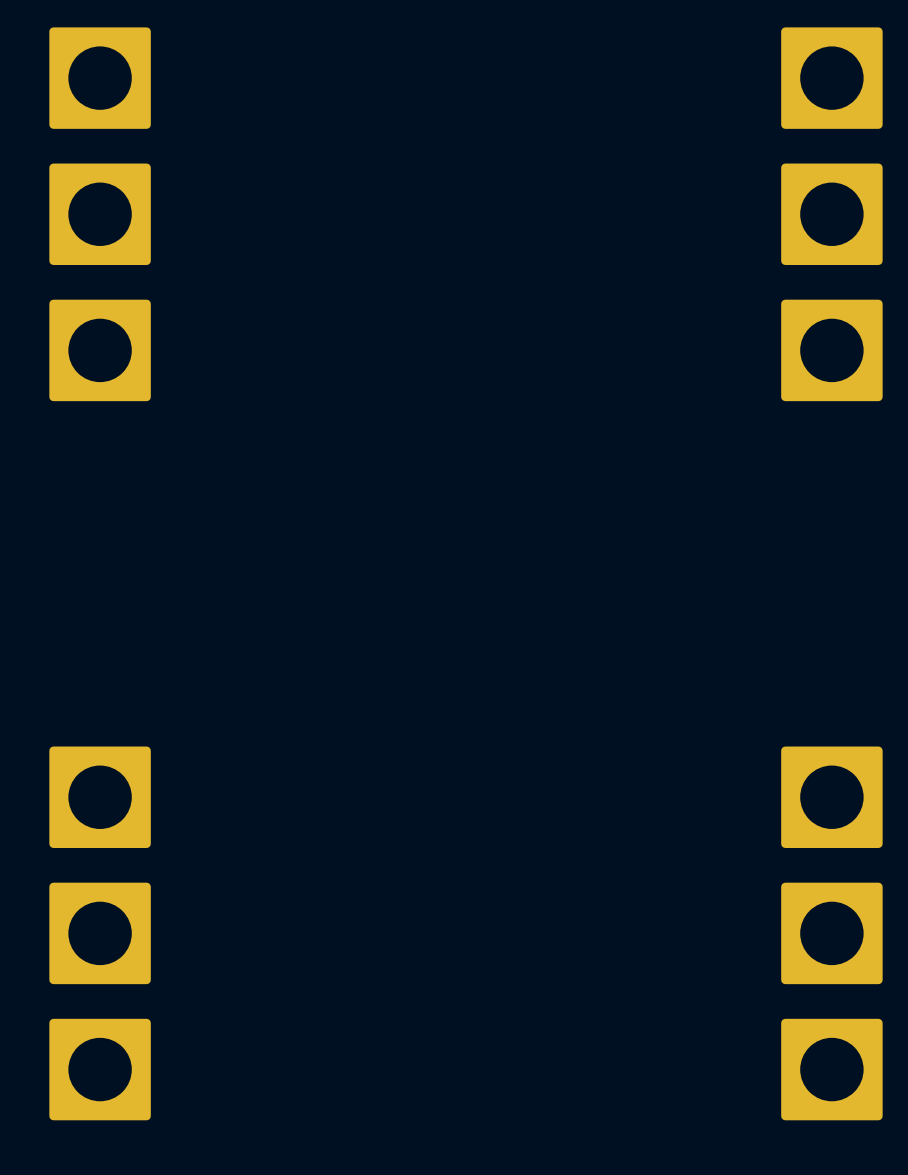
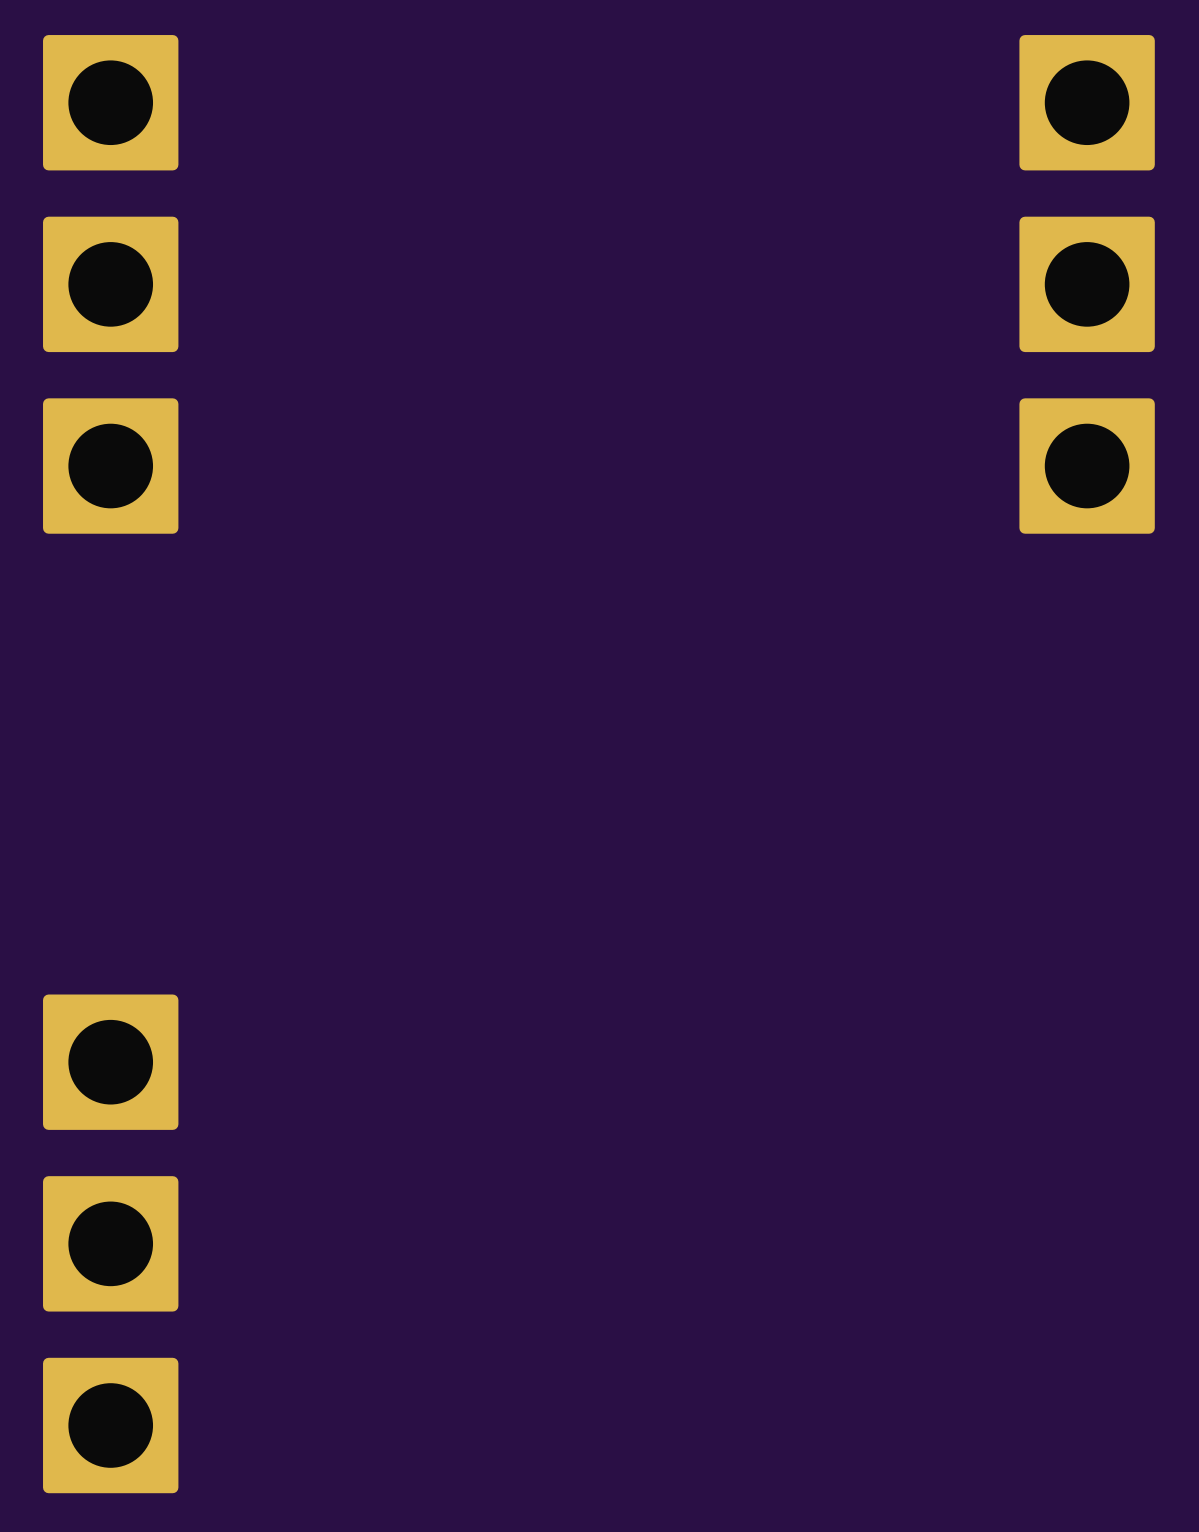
part: (831, 797) -> none
part: (831, 933) -> none
part: (831, 1069) -> none

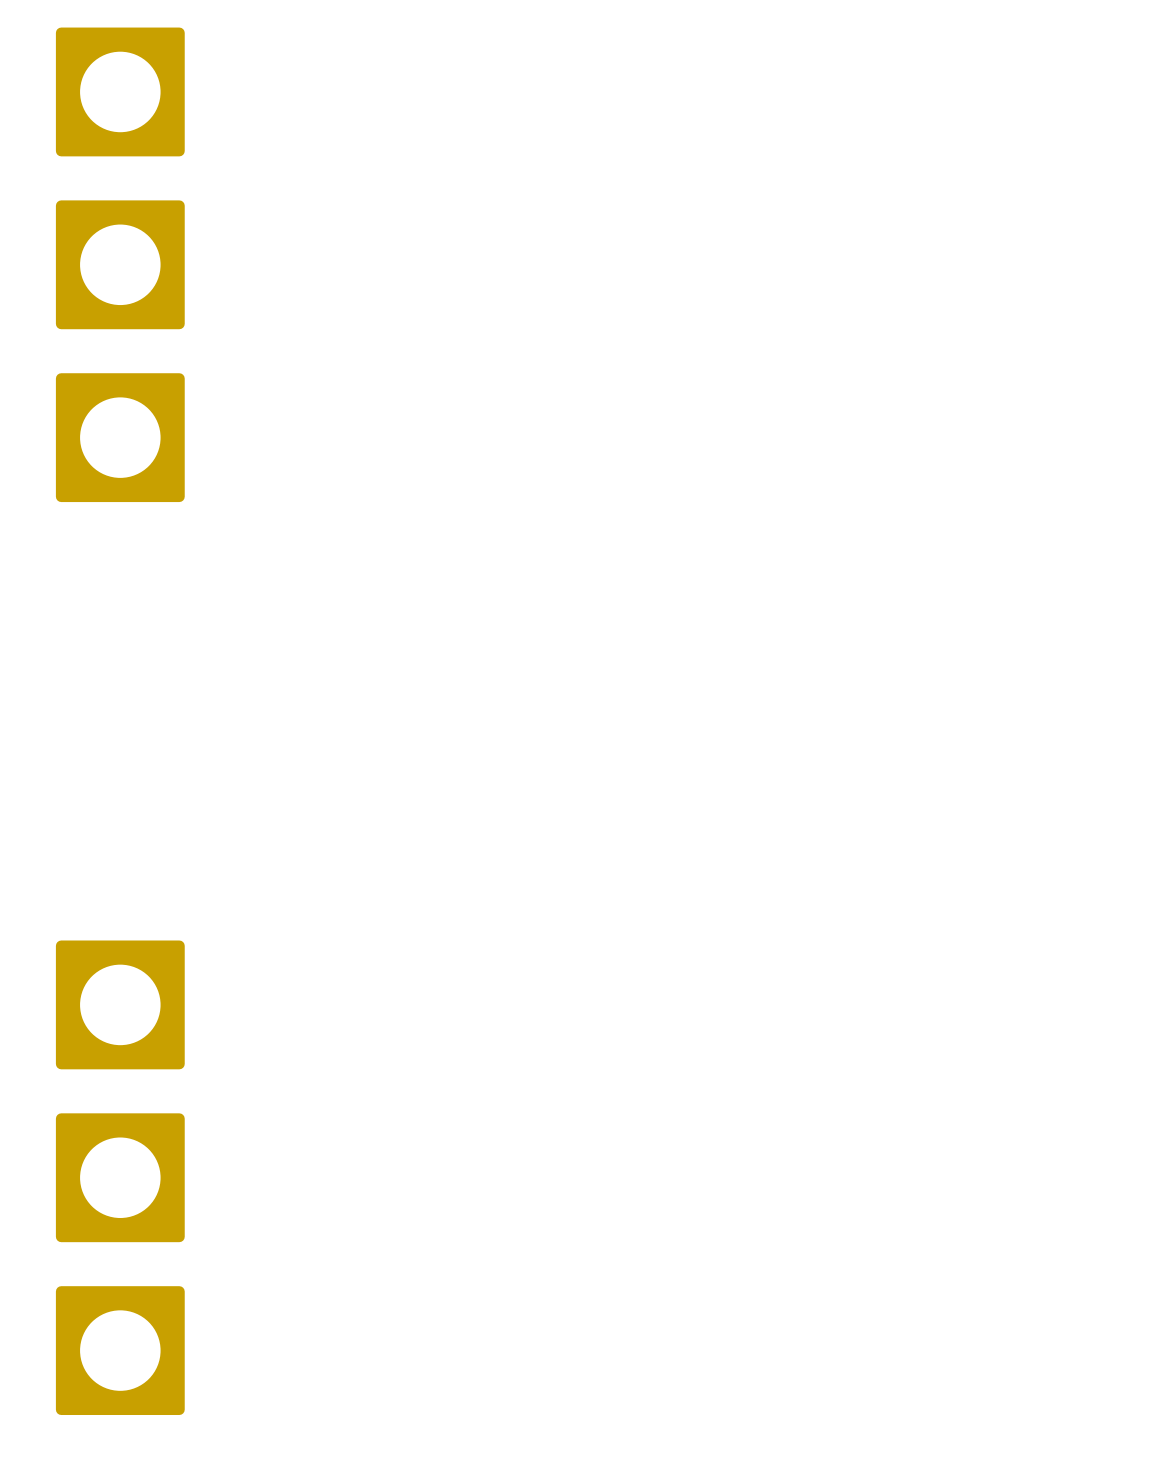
part: (1087, 102) -> none
part: (1087, 284) -> none
part: (1087, 466) -> none

